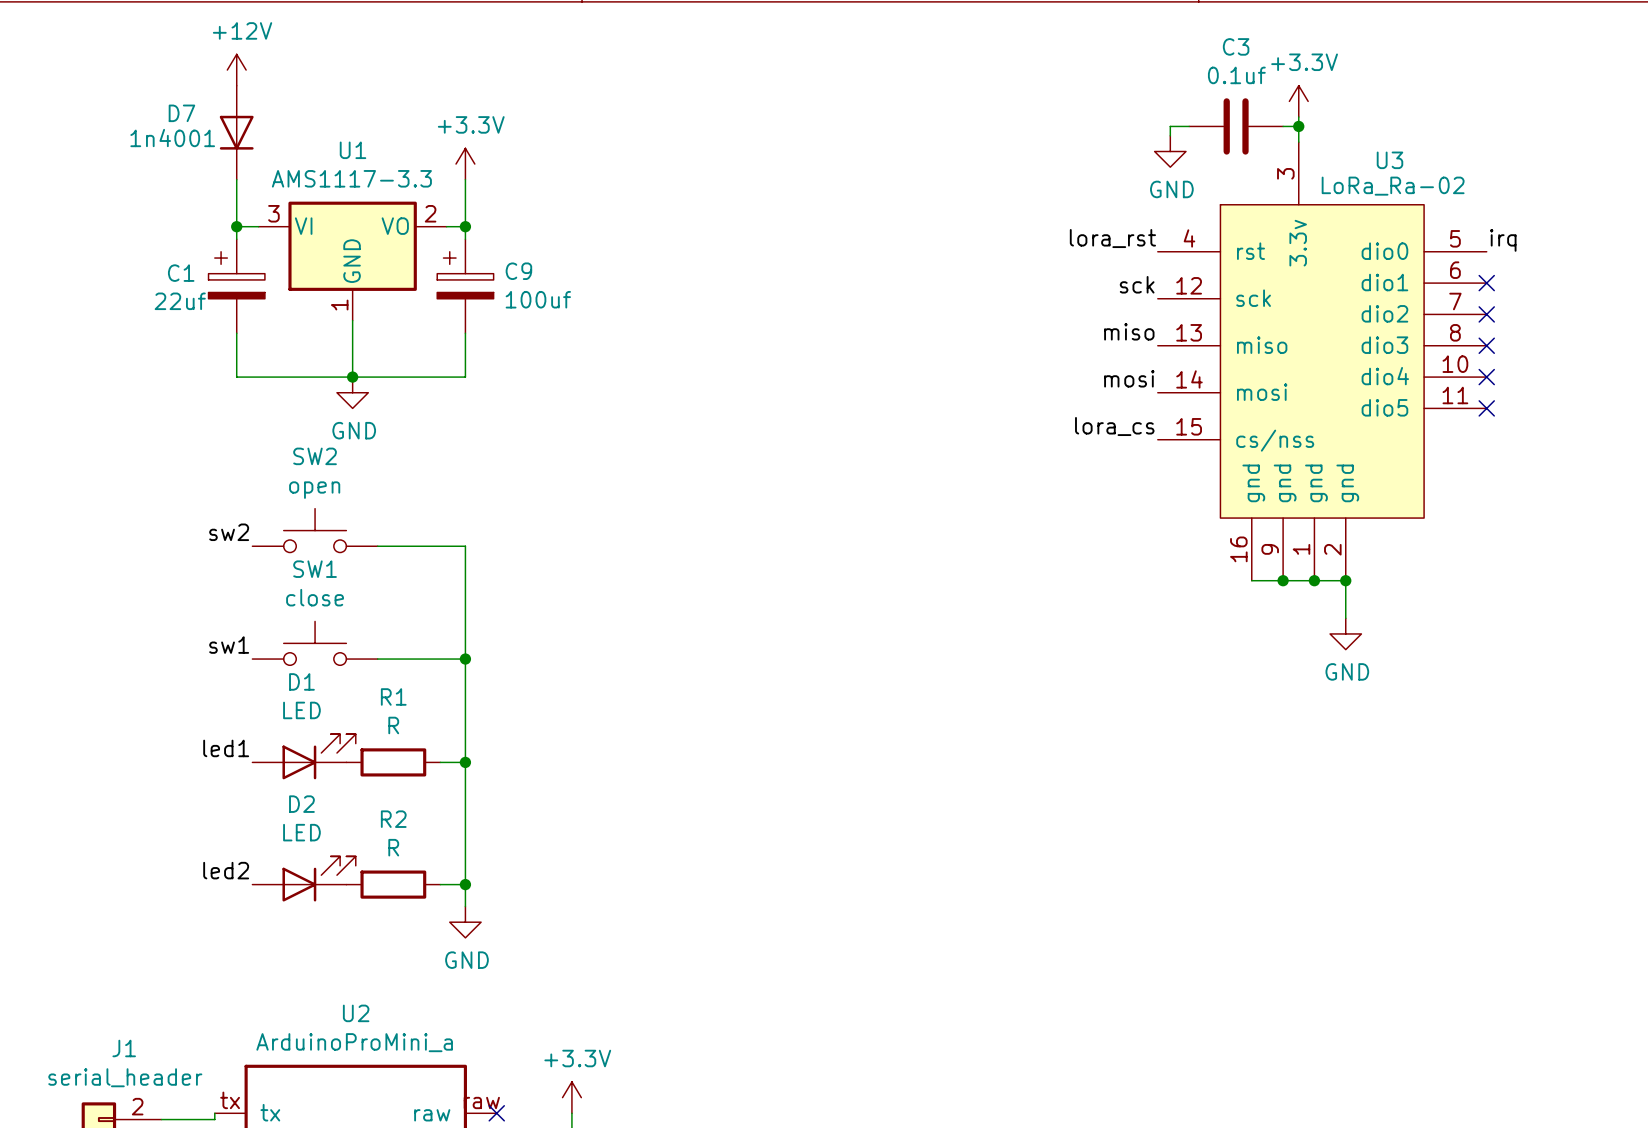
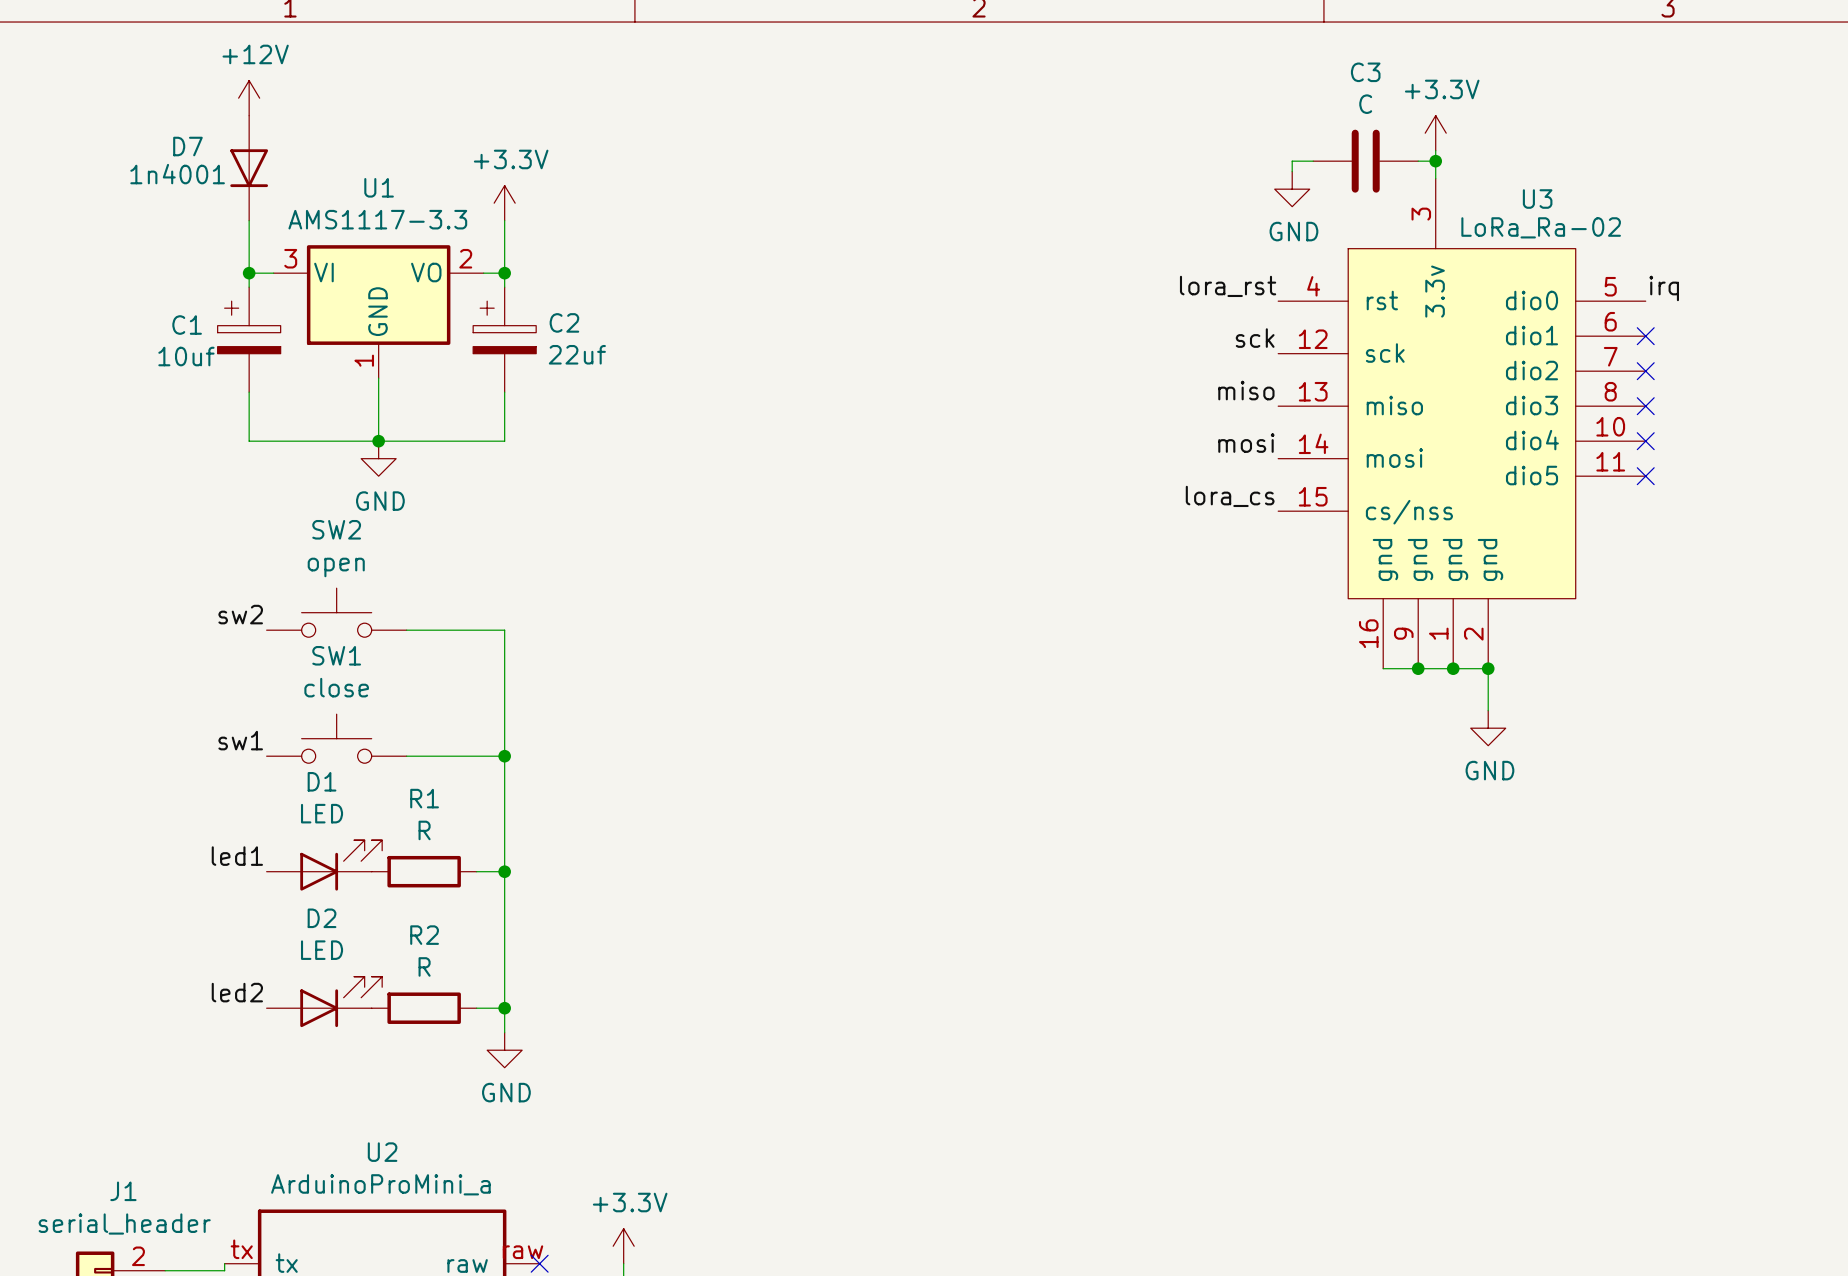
C3 value: 0.1uf (1236, 75) -> C (1365, 104)
C9 name: C9 (518, 271) -> C2 (564, 322)
C9 value: 100uf (538, 299) -> 22uf (577, 354)
C1 value: 22uf (180, 301) -> 10uf (186, 356)

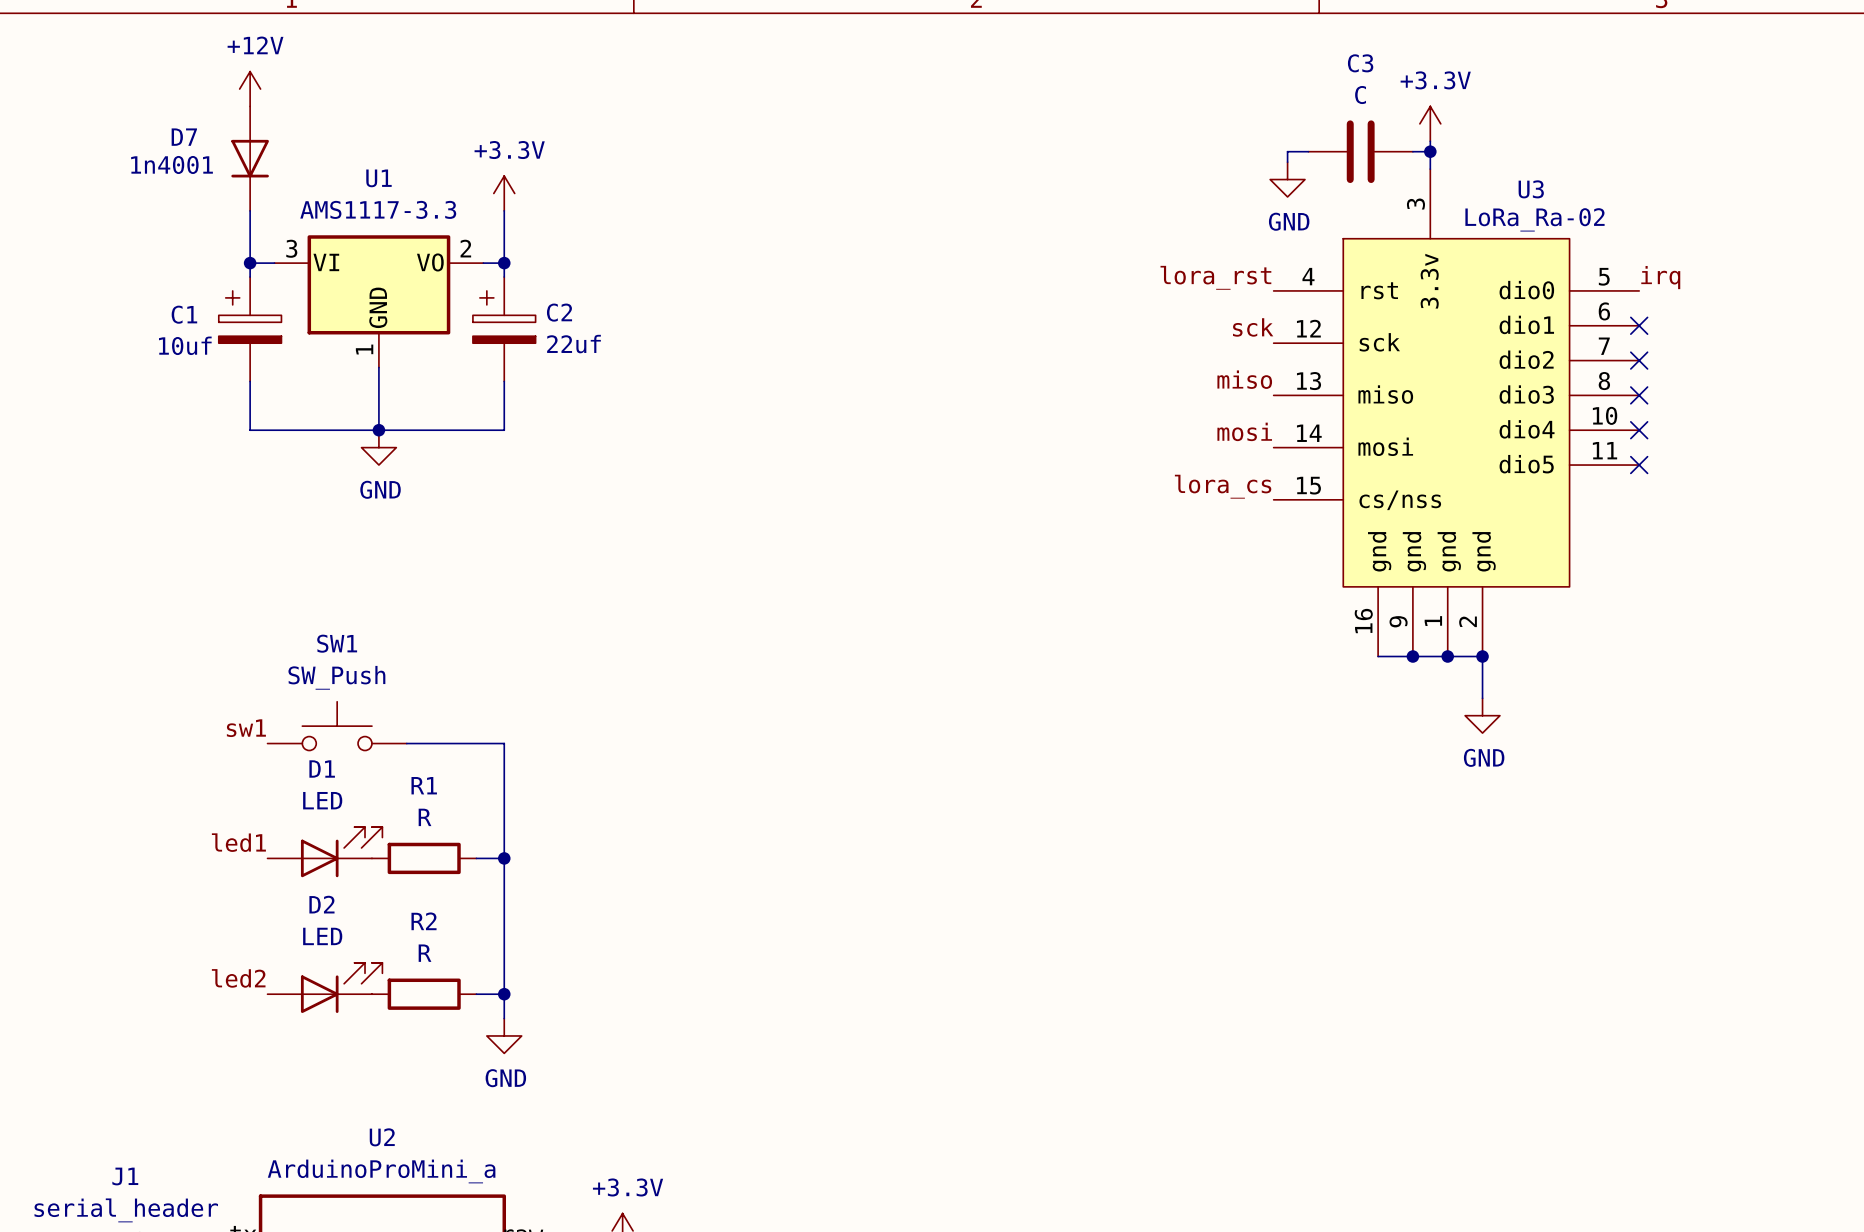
SW2: open (336, 612) -> none
label: sw2 (240, 614) -> none
wire: (406, 630) (504, 630) (504, 756) -> none
SW1 value: close (336, 687) -> SW_Push (336, 677)
junction: (504, 756) -> none

